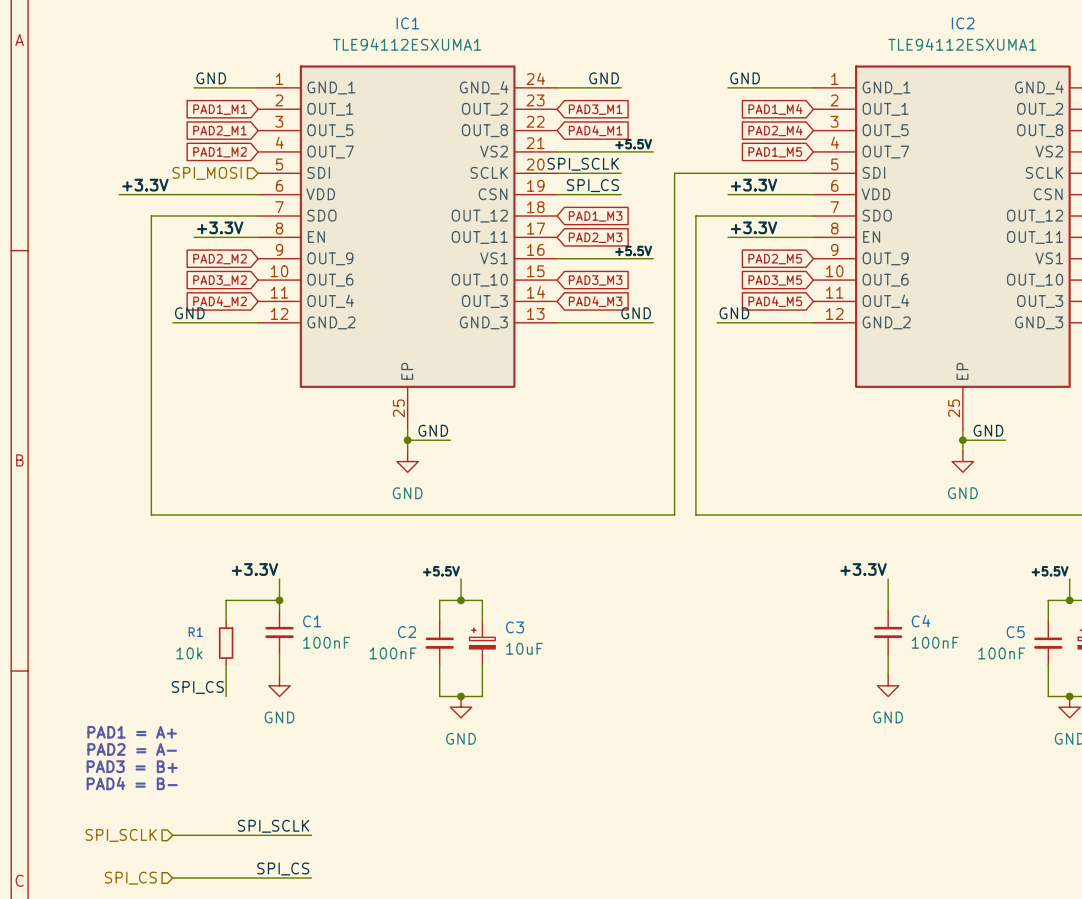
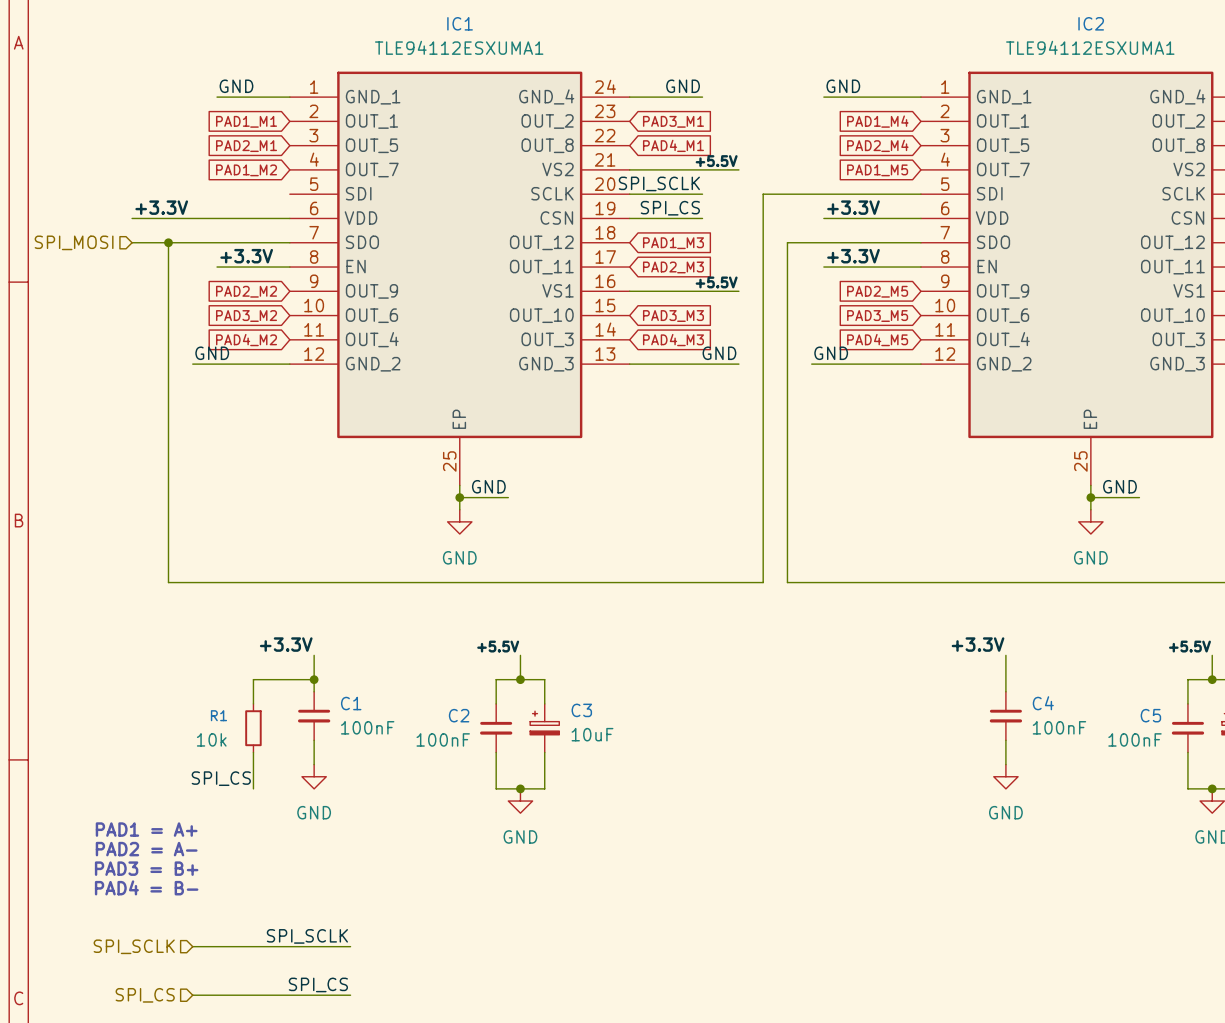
hierarchical label position: SPI_MOSI (207, 173) -> SPI_MOSI (74, 242)
wire: none -> (132, 242) (168, 242)
junction: none -> (168, 242)

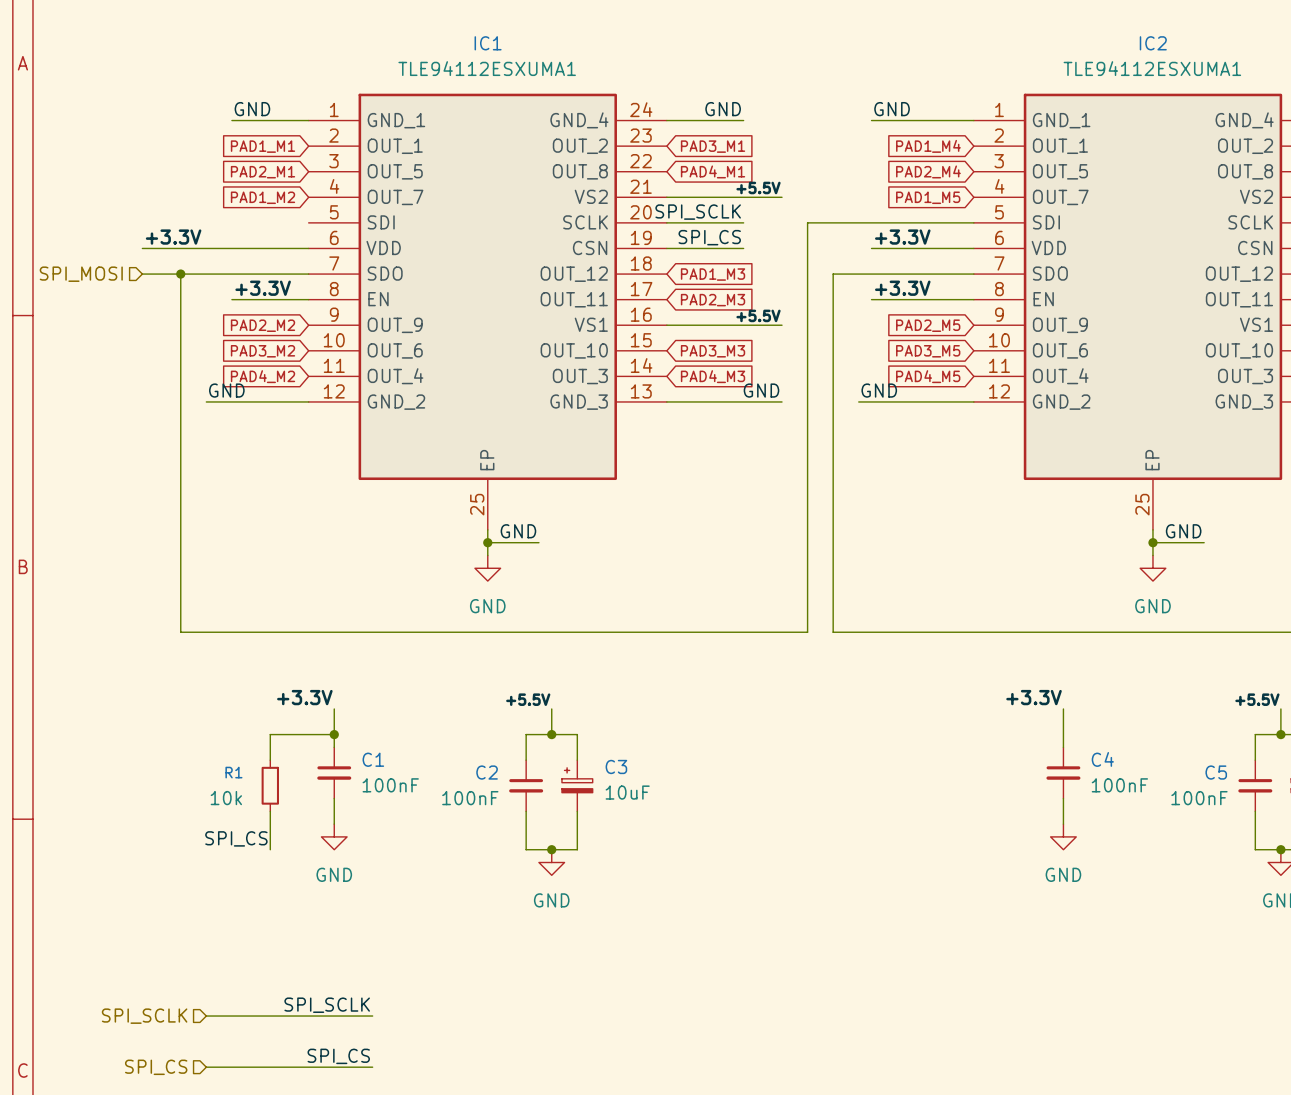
text: PAD1 = A+ (146, 829) -> none
text: PAD2 = A- (146, 849) -> none
text: PAD3 = B+ (146, 868) -> none
text: PAD4 = B- (146, 887) -> none

